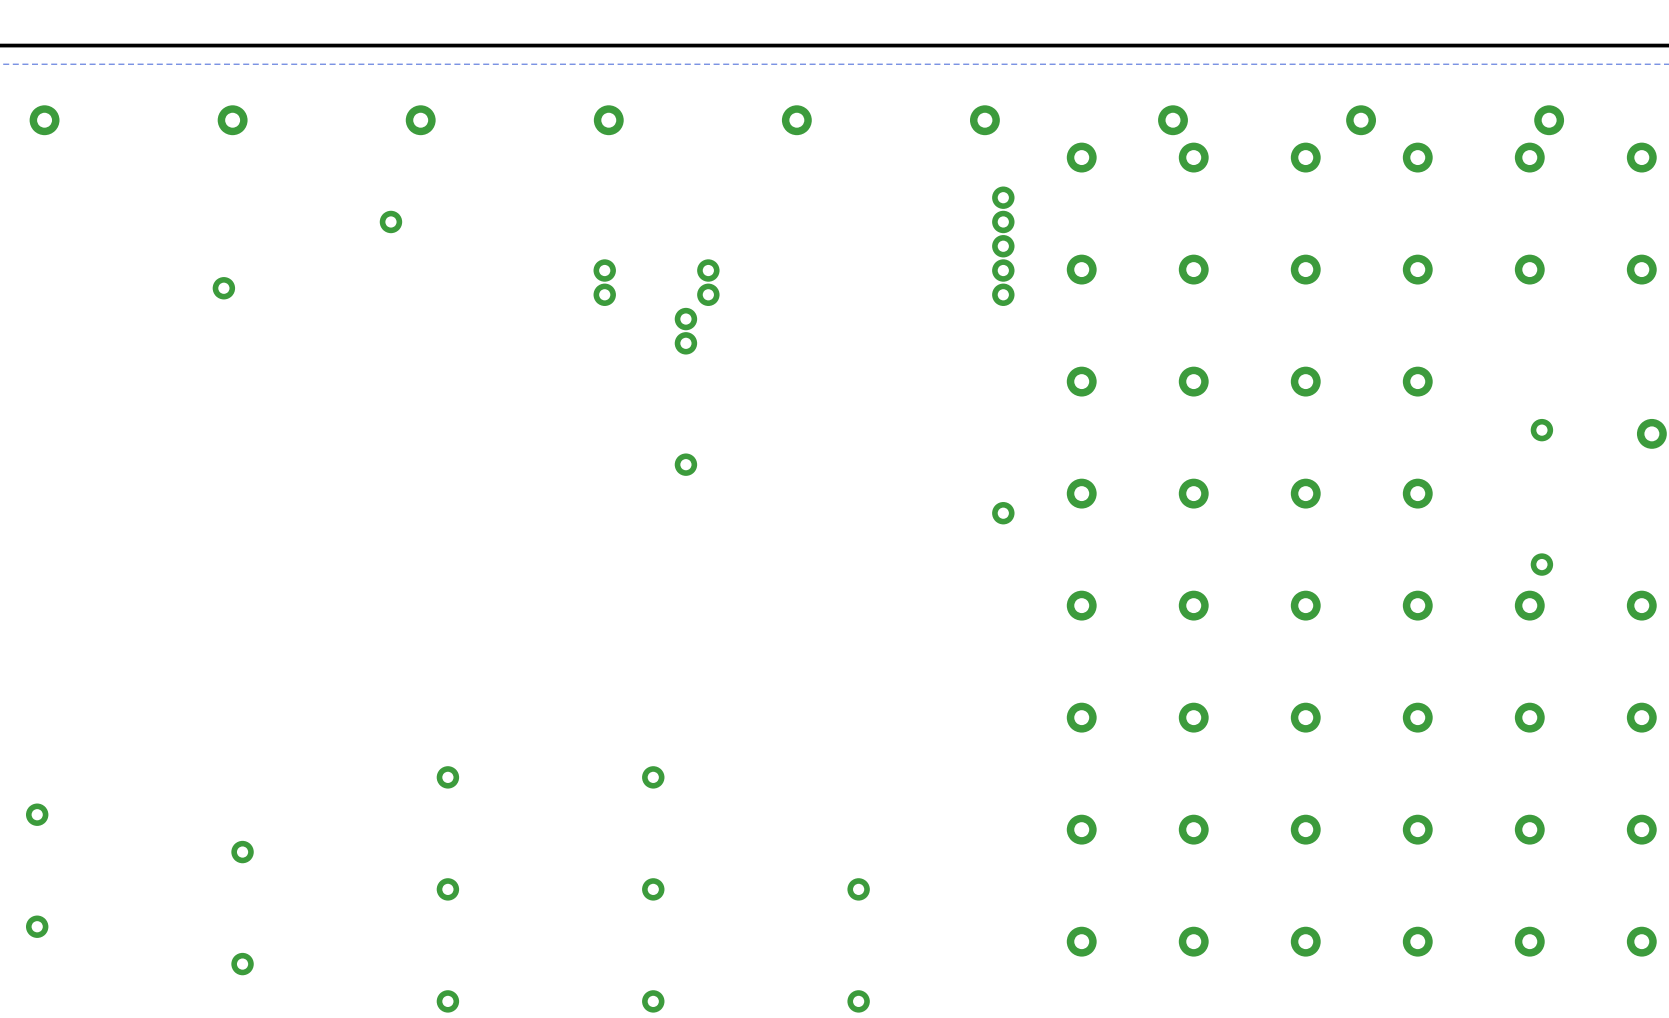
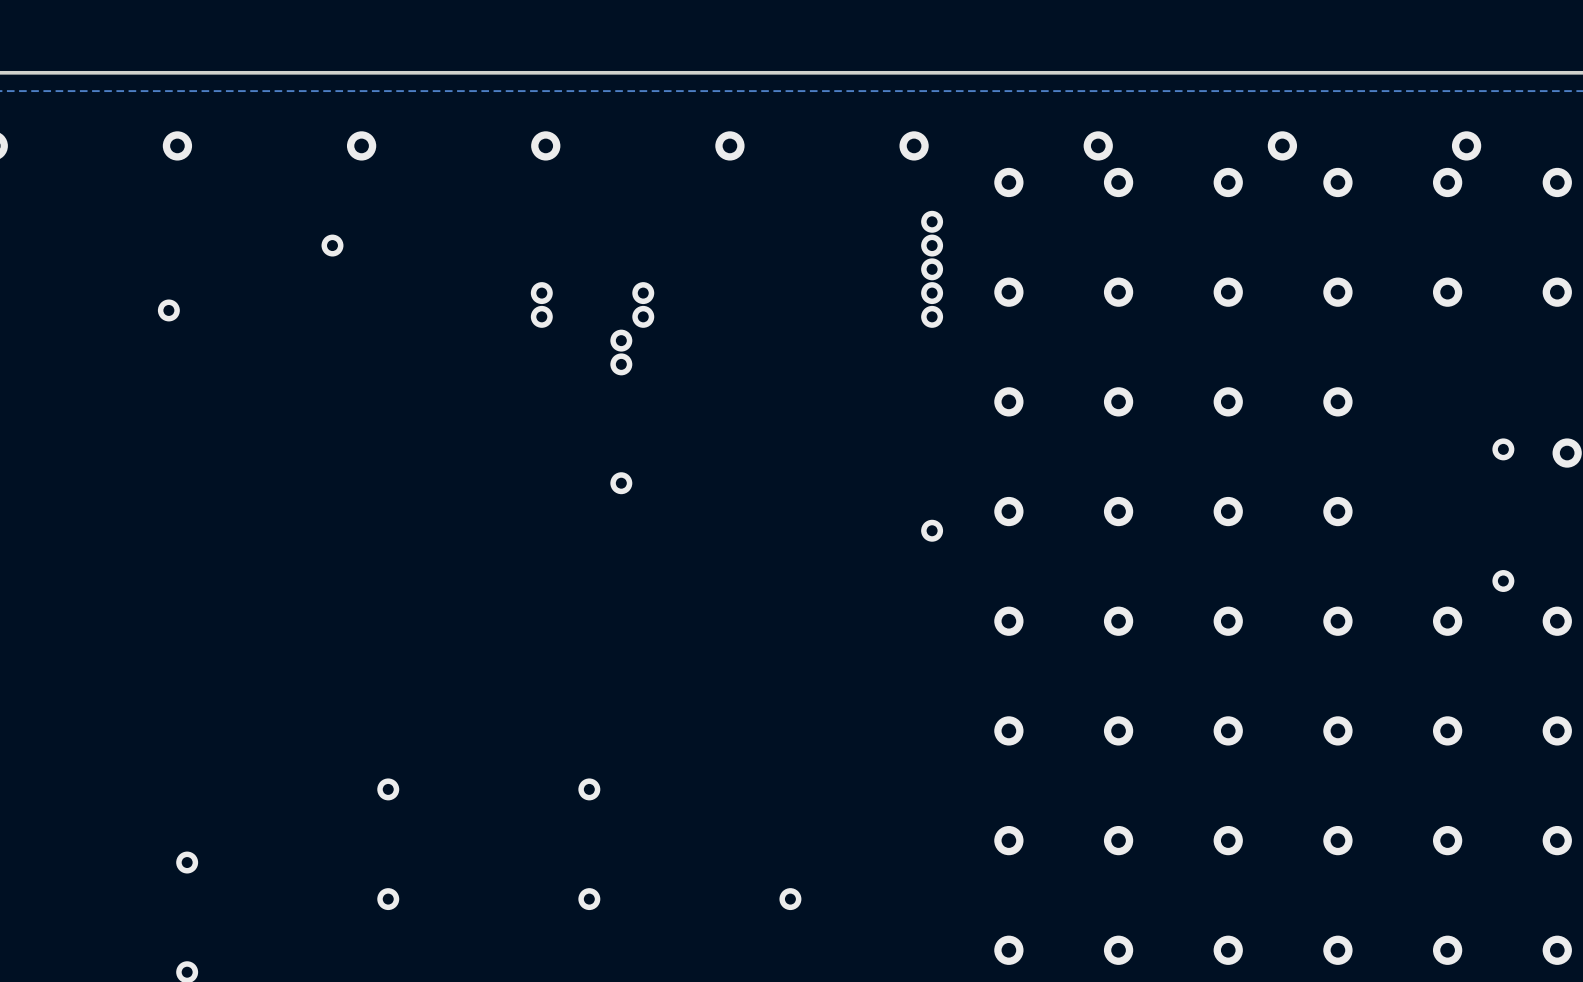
via position: (1541, 430) -> (1503, 449)
via position: (1541, 564) -> (1503, 581)

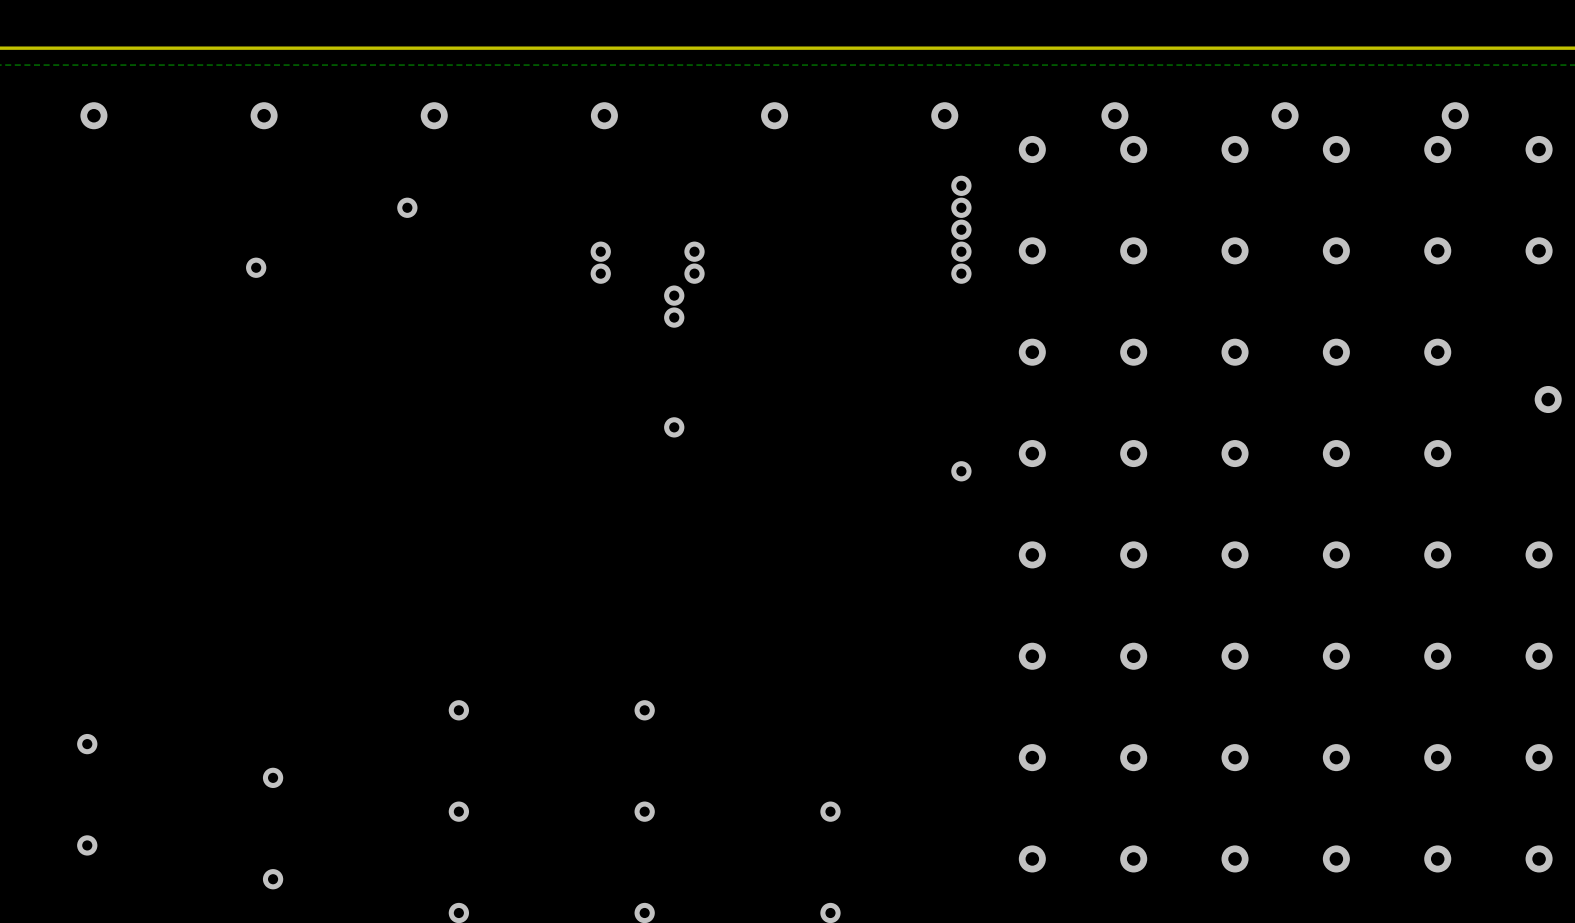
via: none -> (1437, 352)
via: (1503, 449) -> none
via: none -> (1437, 453)
via: (1503, 581) -> none

